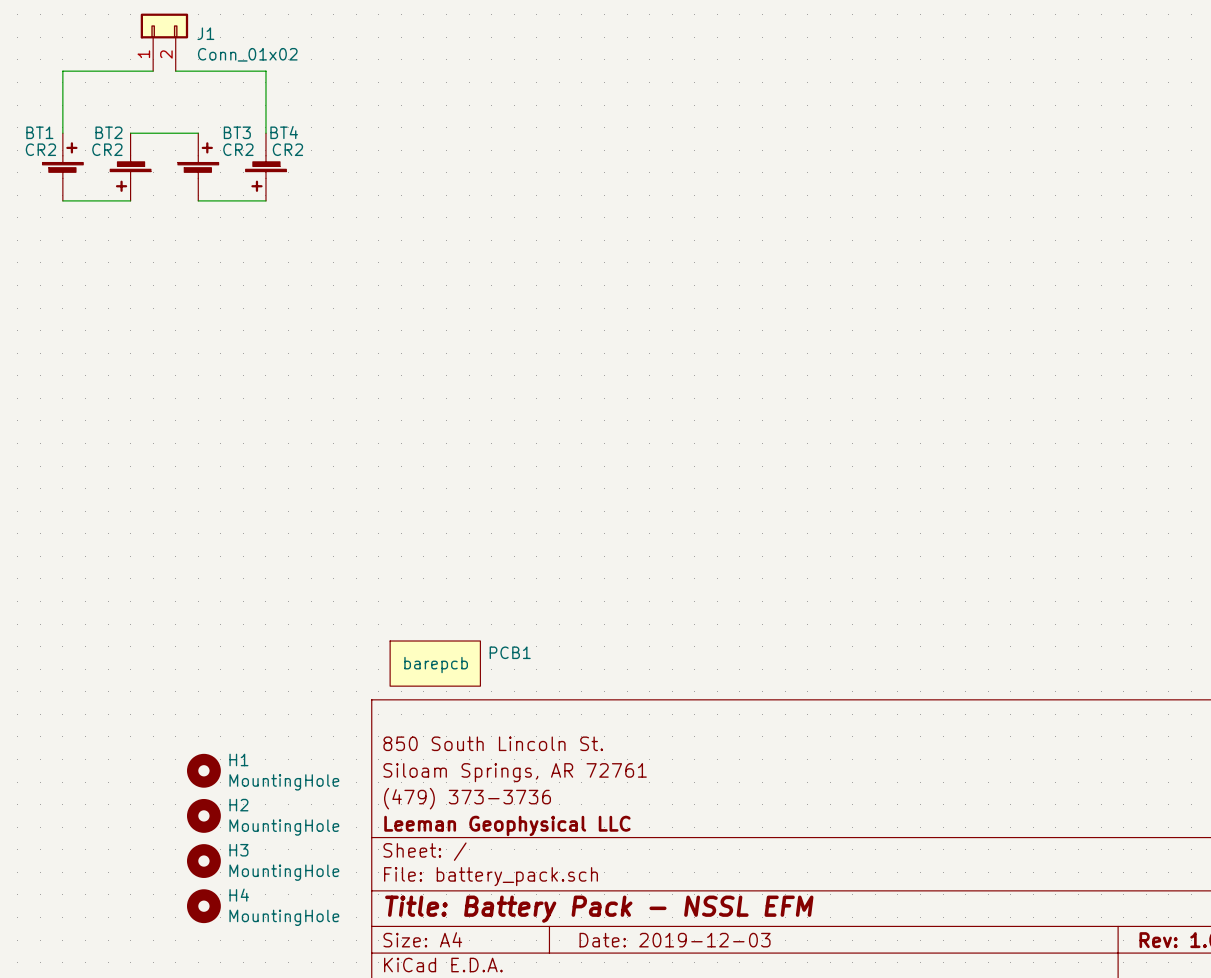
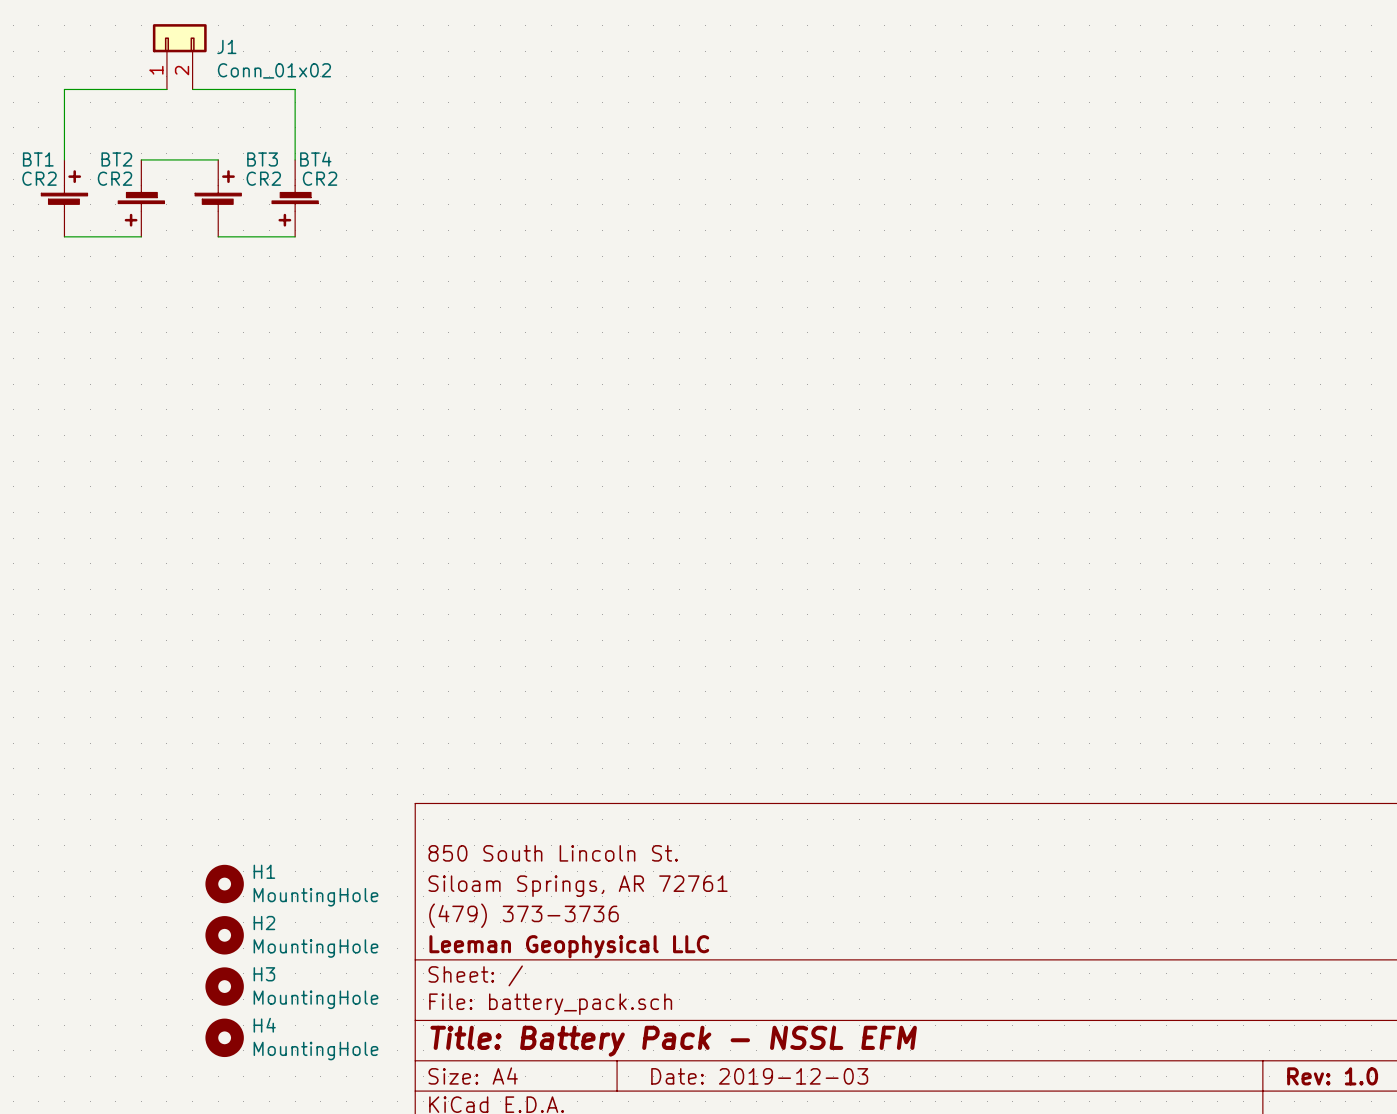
PCB1: barepcb (435, 663) -> none

